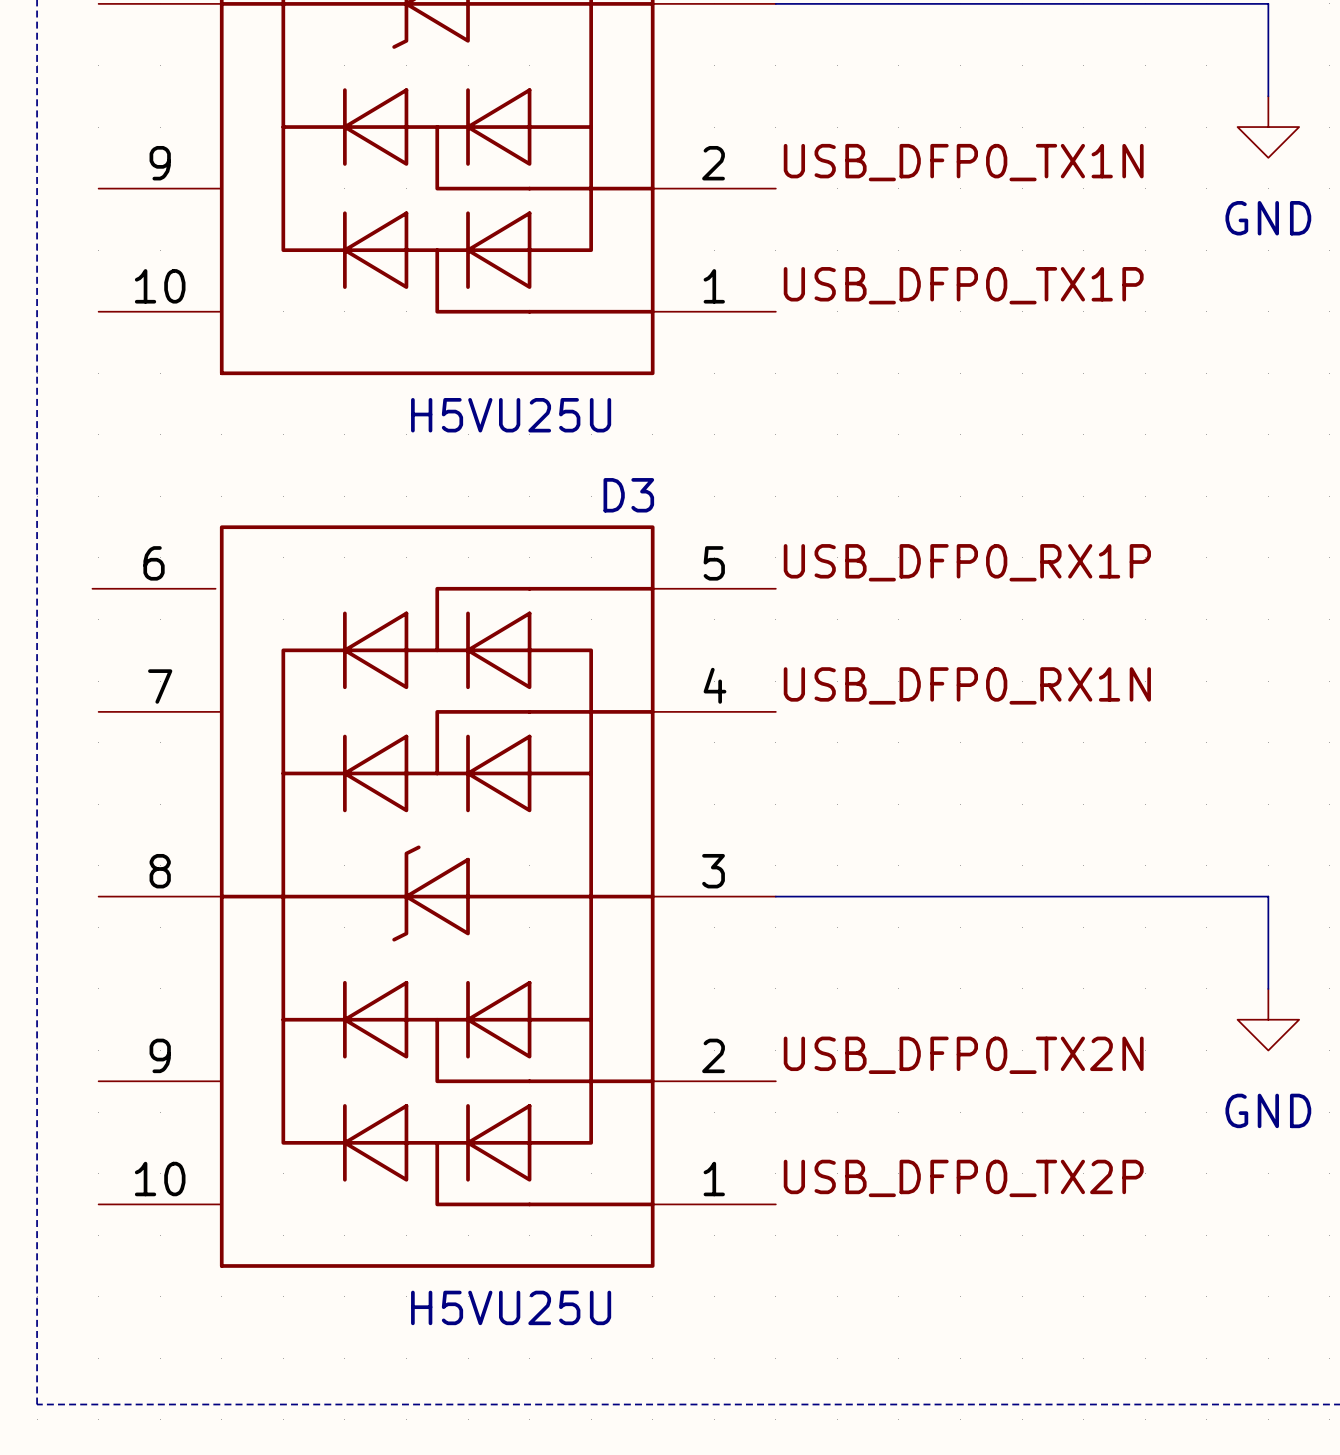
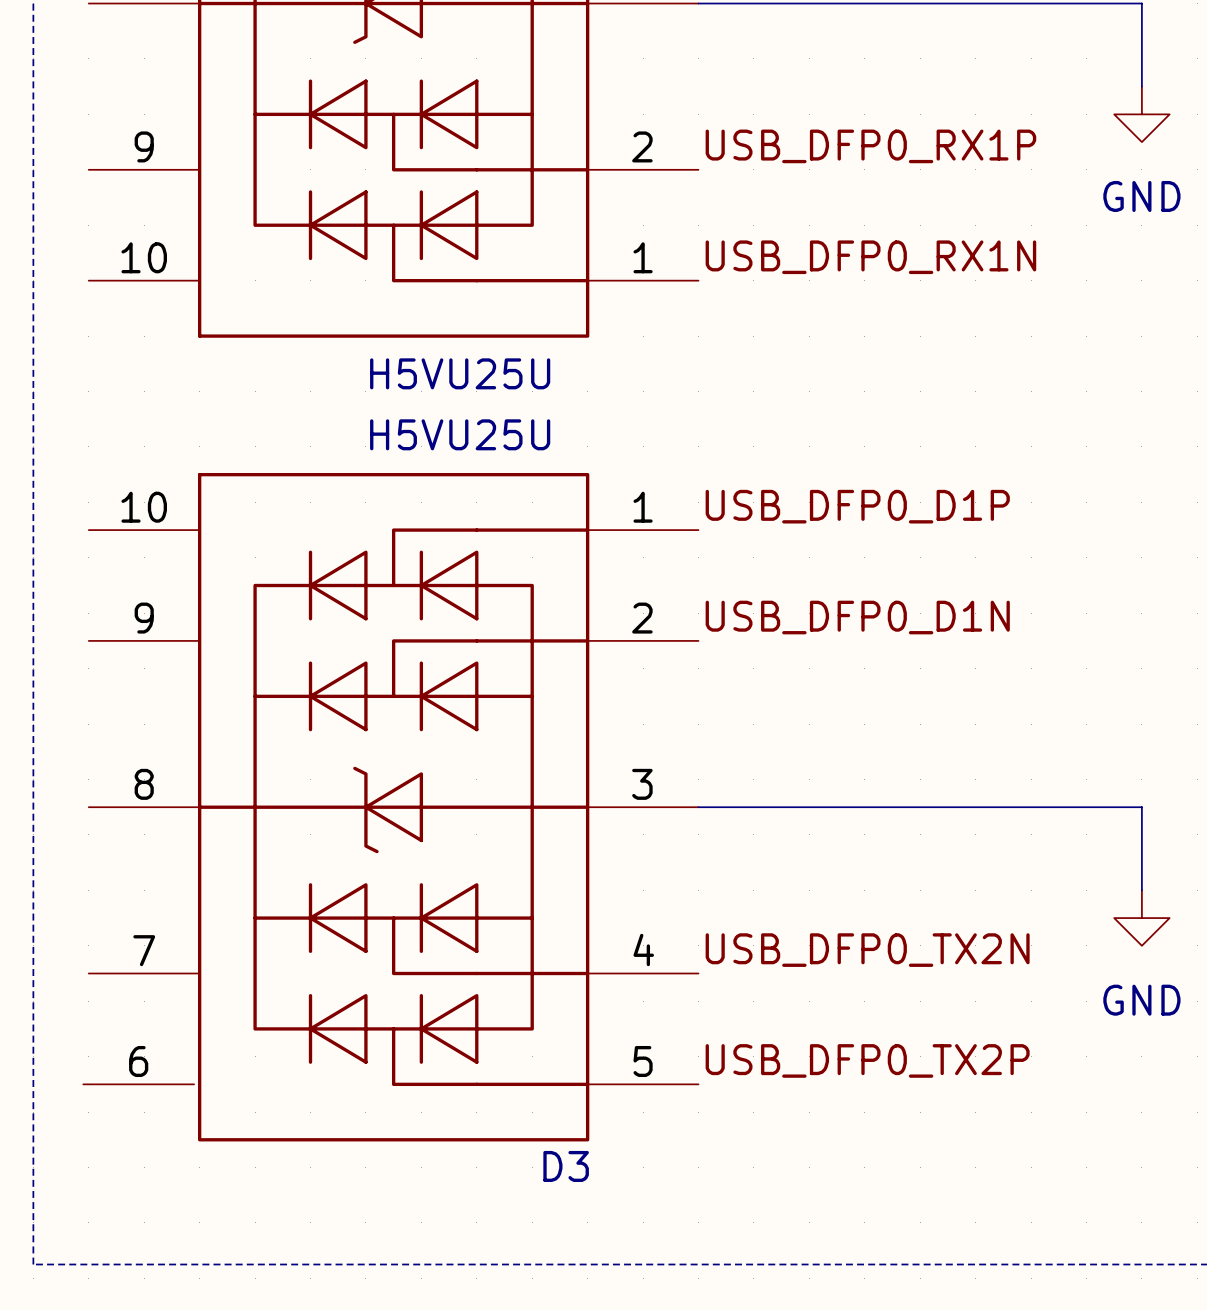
label: USB_DFP0_TX1N (963, 162) -> USB_DFP0_RX1P (870, 146)
label: USB_DFP0_TX1P (963, 285) -> USB_DFP0_RX1N (870, 257)
label: USB_DFP0_RX1P (967, 562) -> USB_DFP0_D1P (857, 506)
label: USB_DFP0_RX1N (967, 685) -> USB_DFP0_D1N (857, 617)
D3 flip: as is (437, 896) -> up-down (393, 807)

